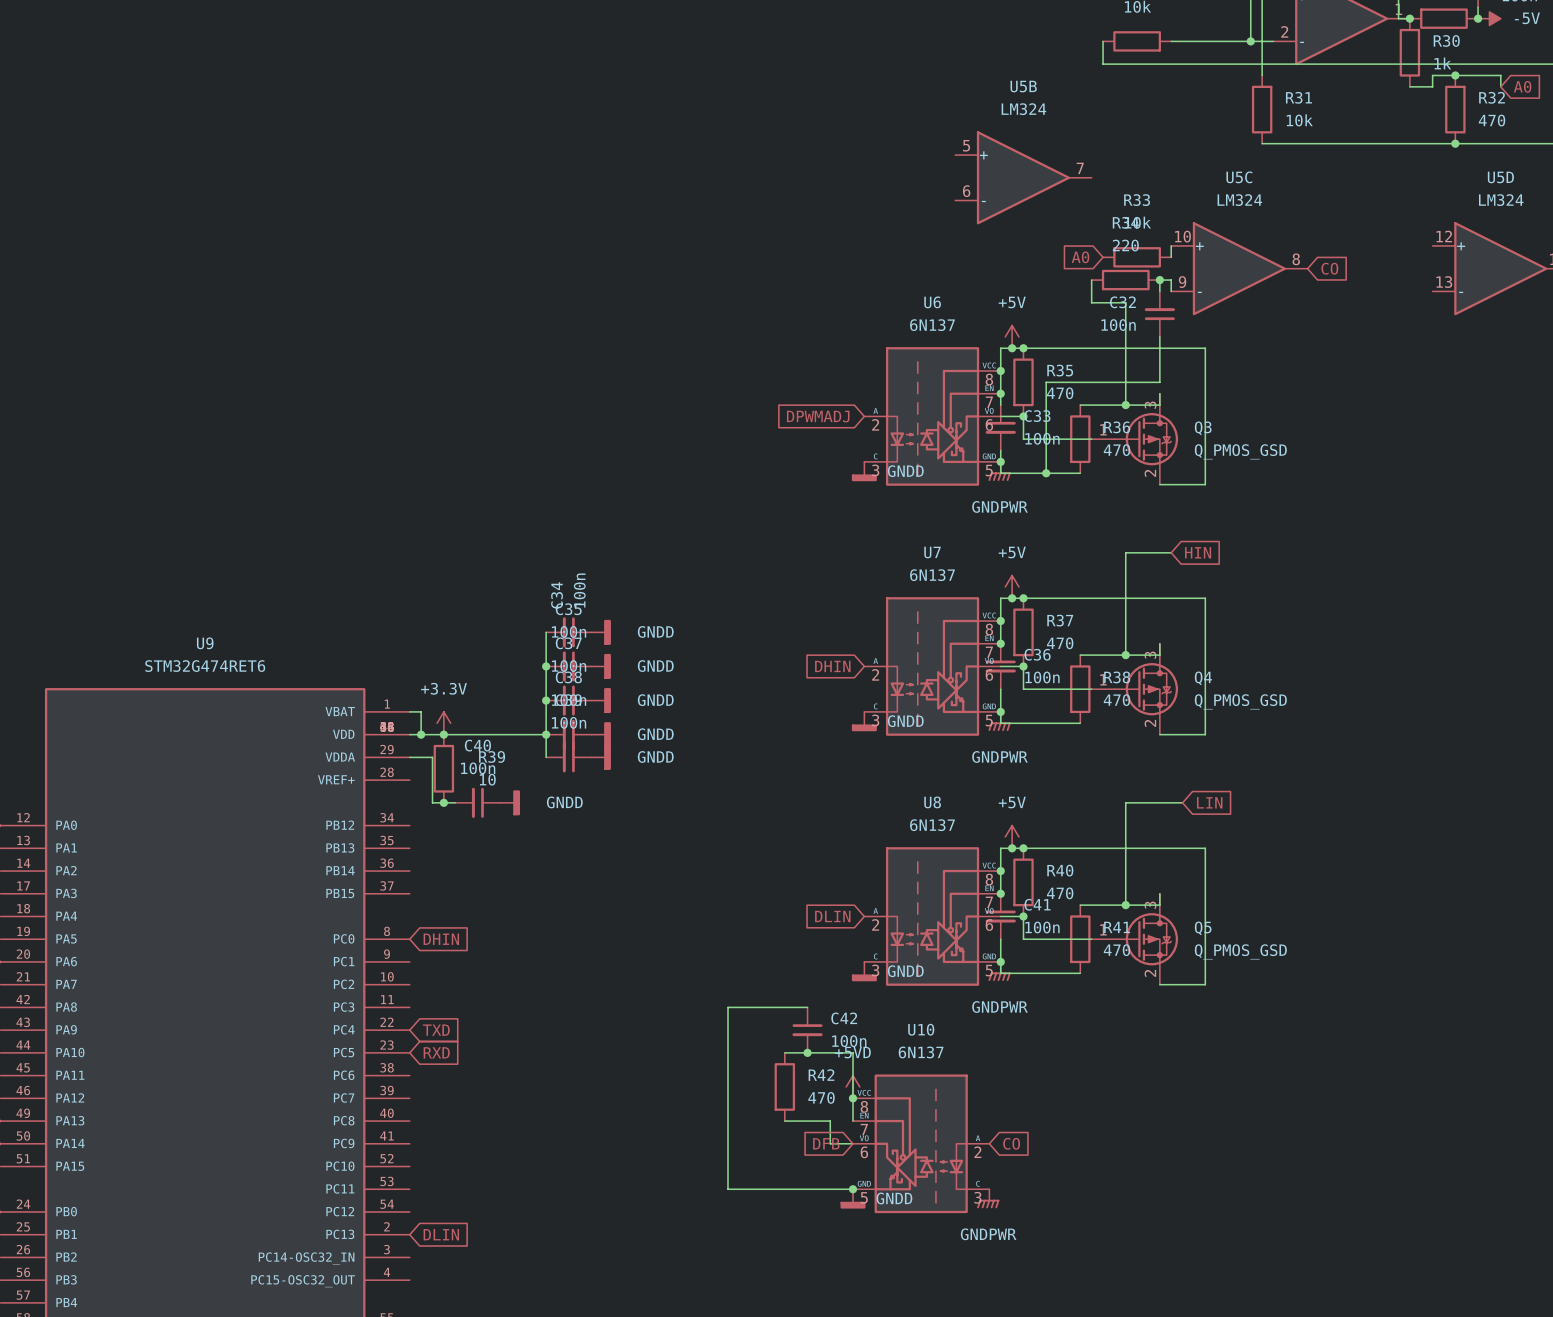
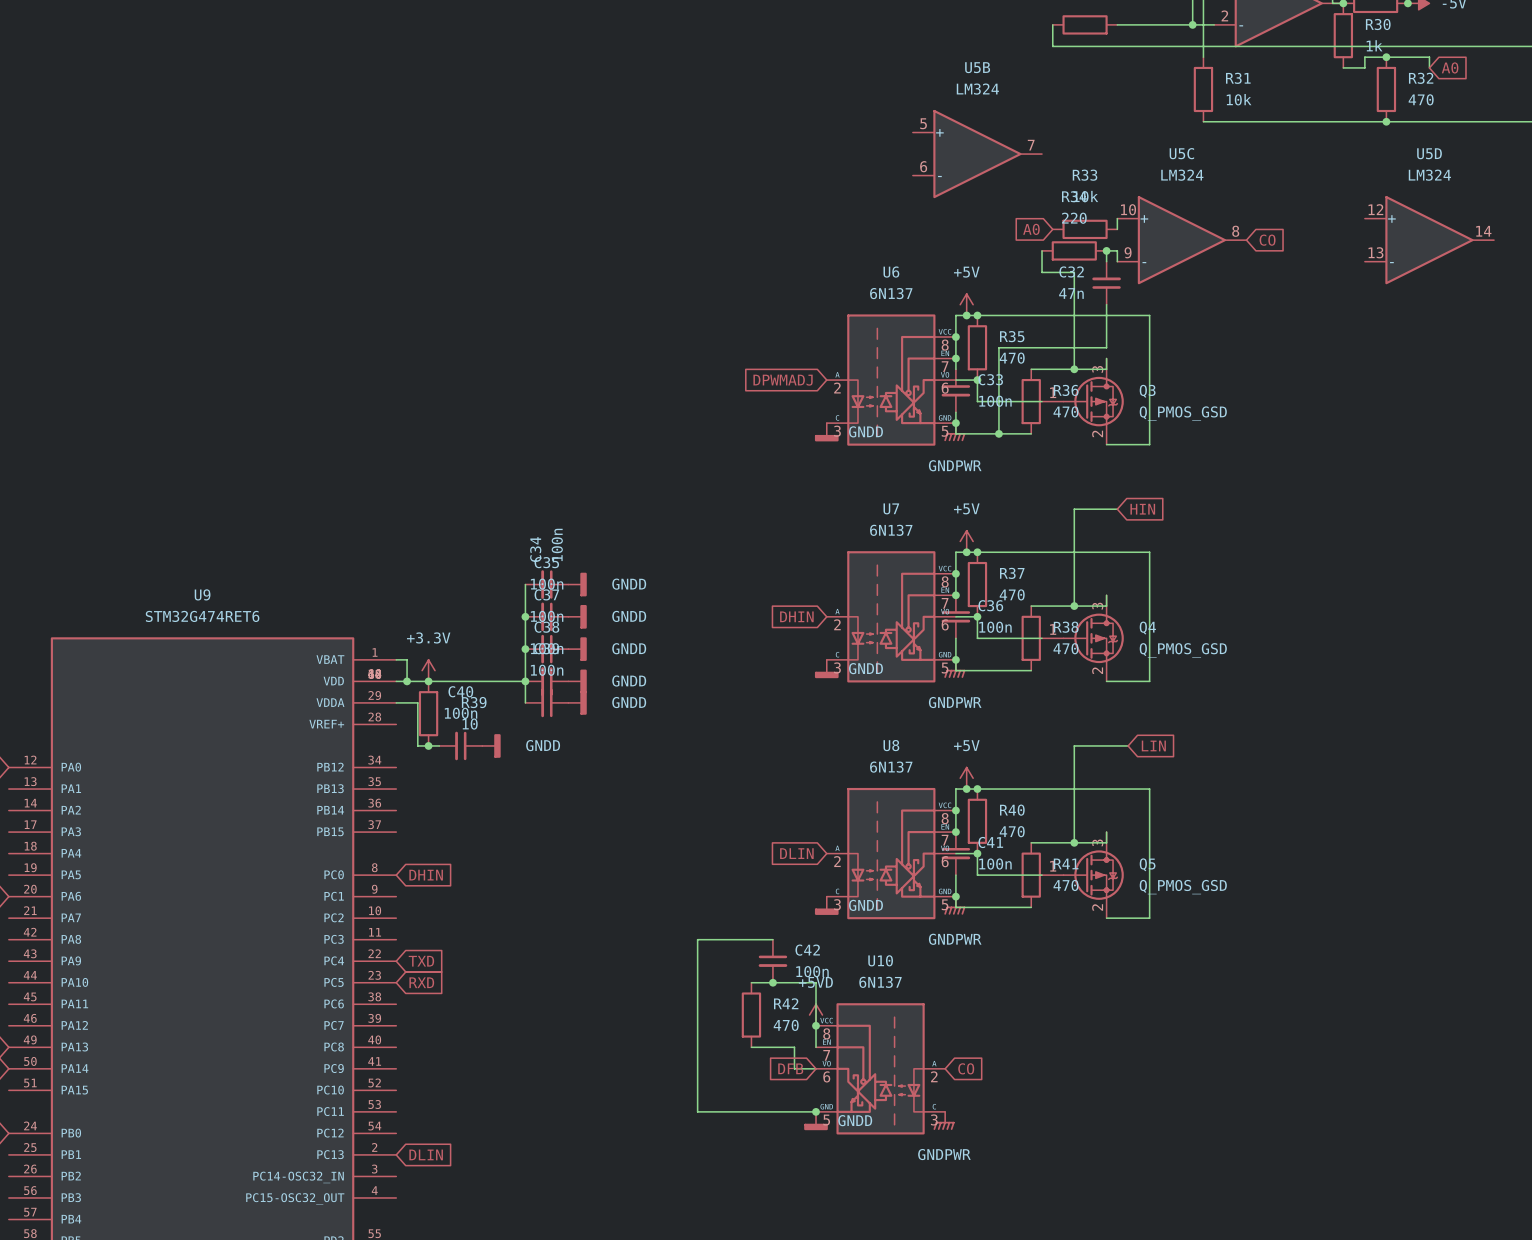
C32 value: 100n (1118, 325) -> 47n (1071, 293)

